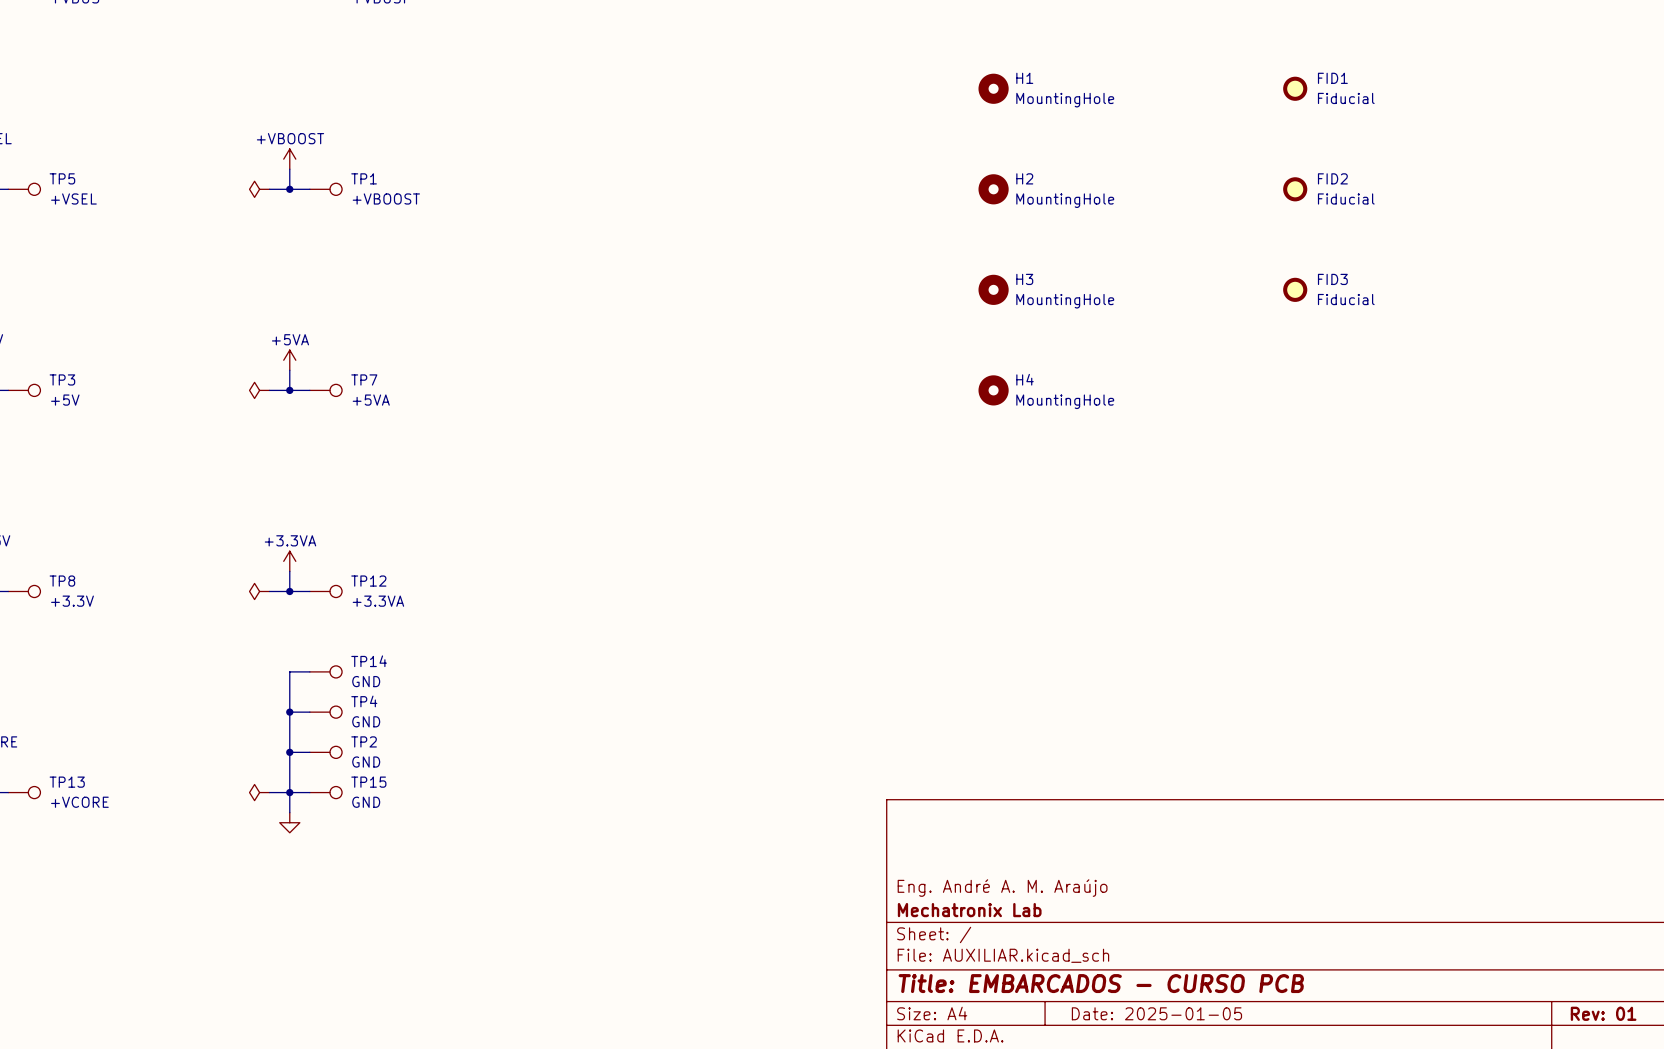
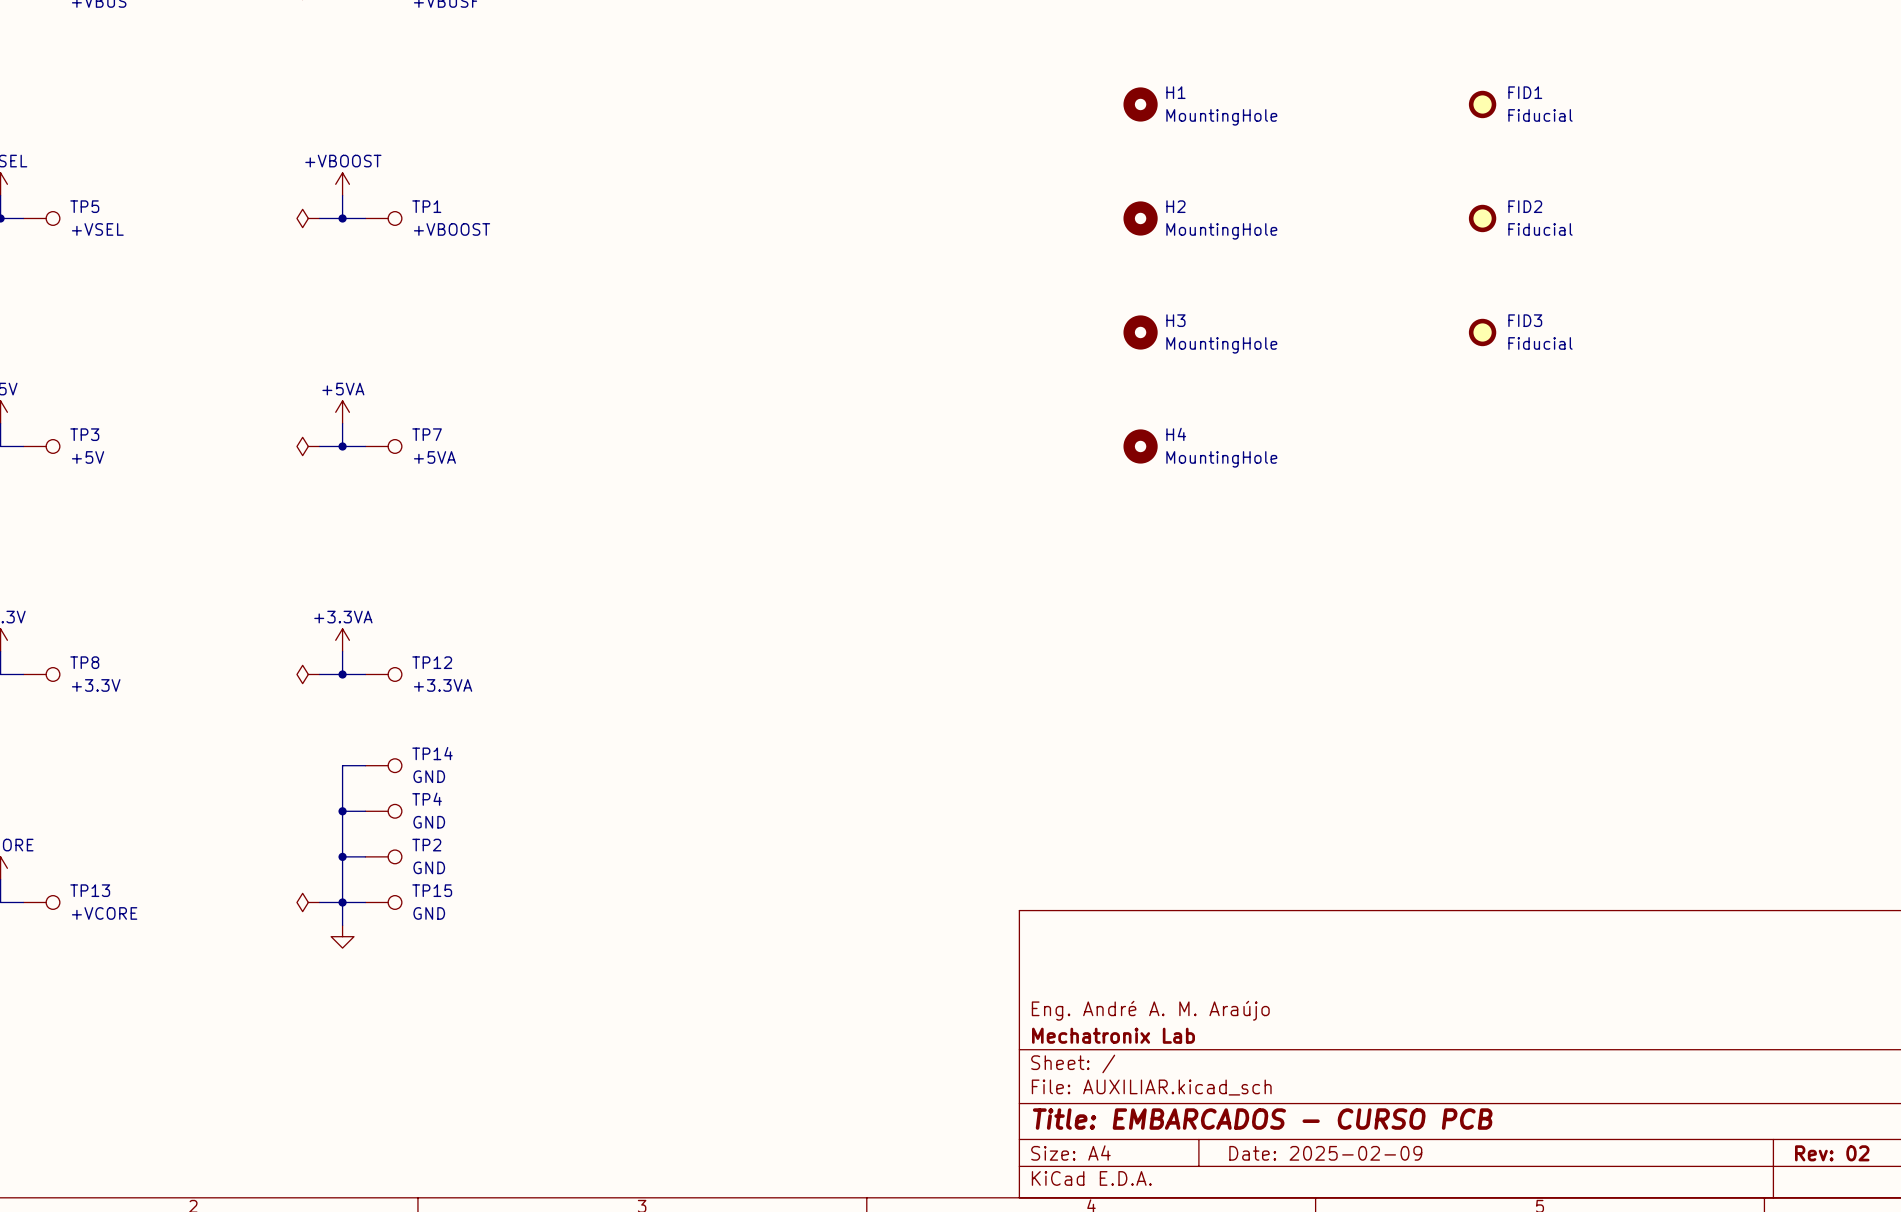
title block: Date: 2025-01-05 (1156, 1013) -> Date: 2025-02-09 (1325, 1153)
title block: Rev: 01 (1603, 1013) -> Rev: 02 (1832, 1153)

